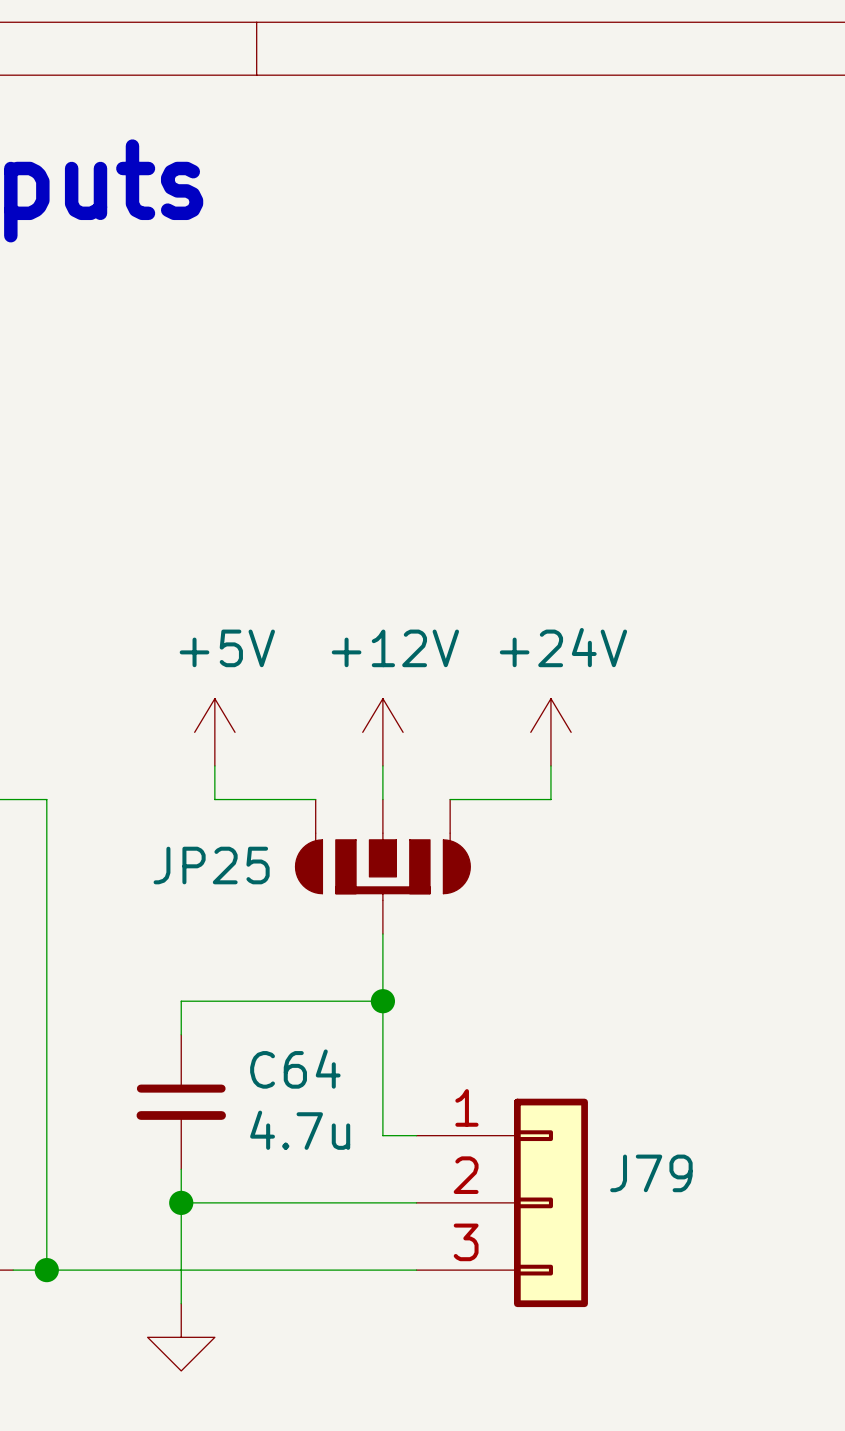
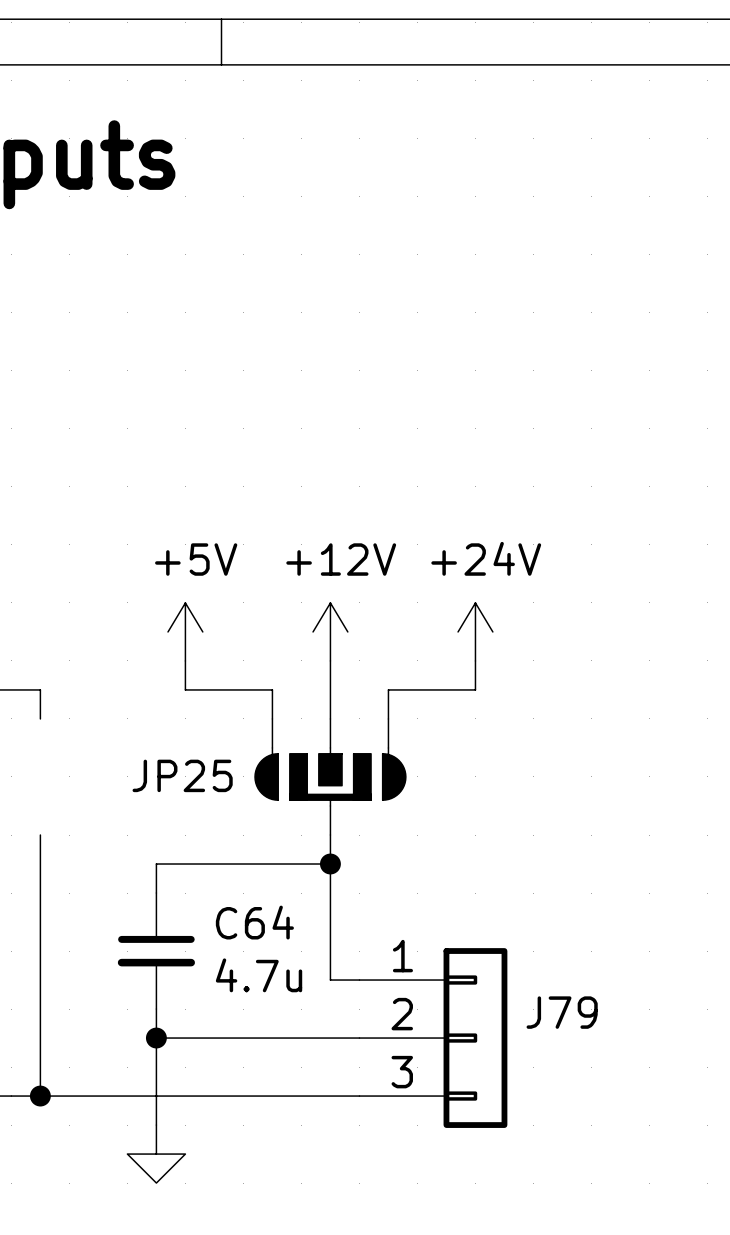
wire: (46, 833) (46, 967) -> none
JP25 position: (382, 866) -> (330, 776)

